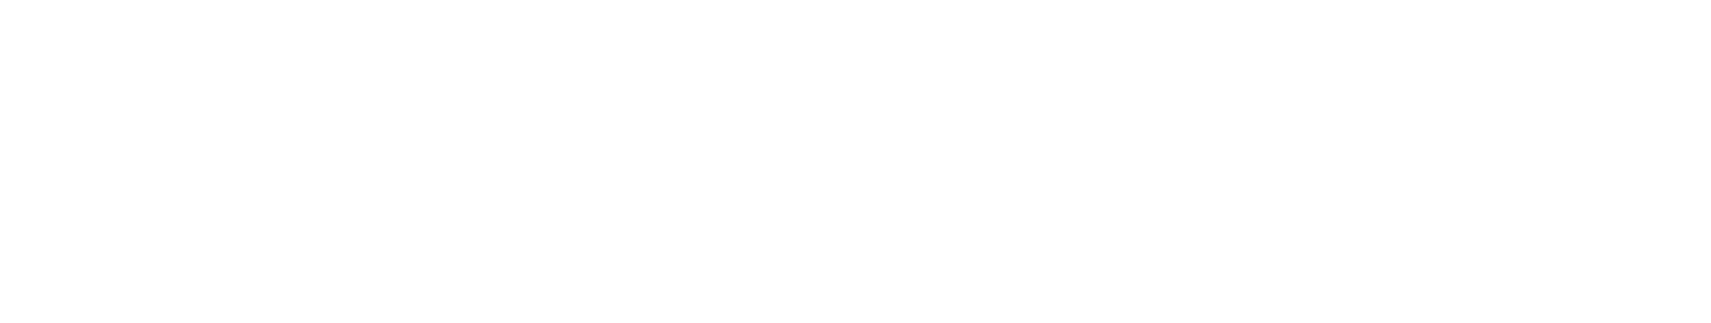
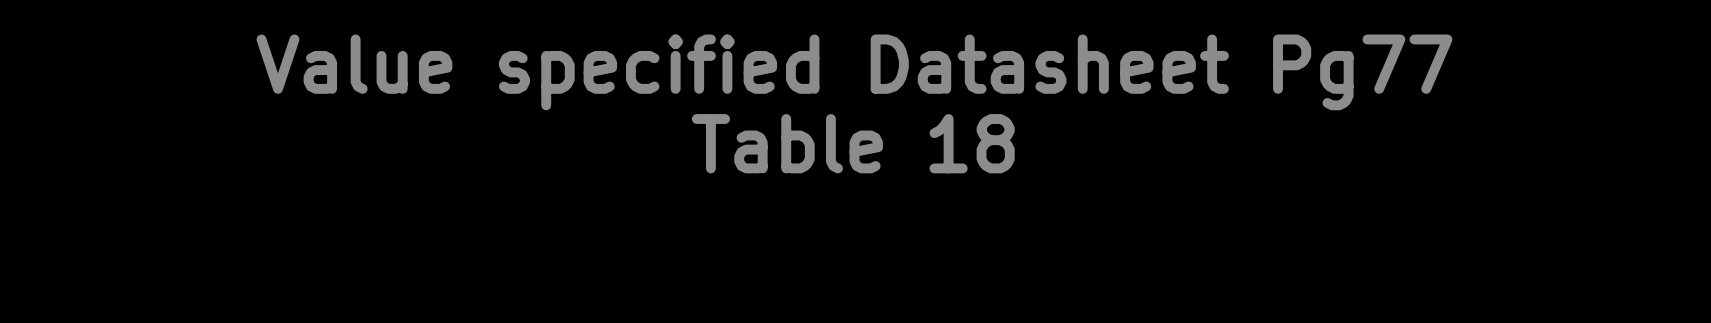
text: none -> Value specified Datasheet Pg77 (854, 72)
text: none -> Table 18 (853, 143)

